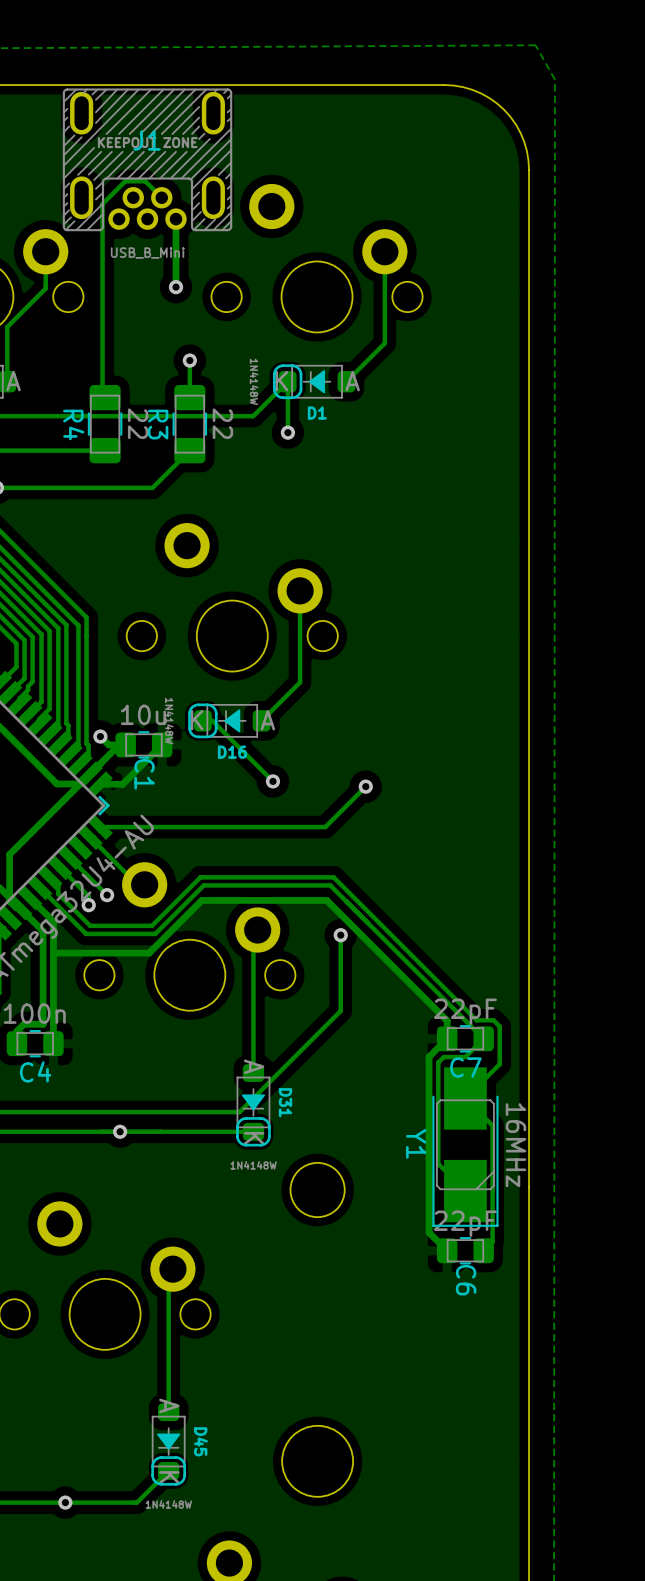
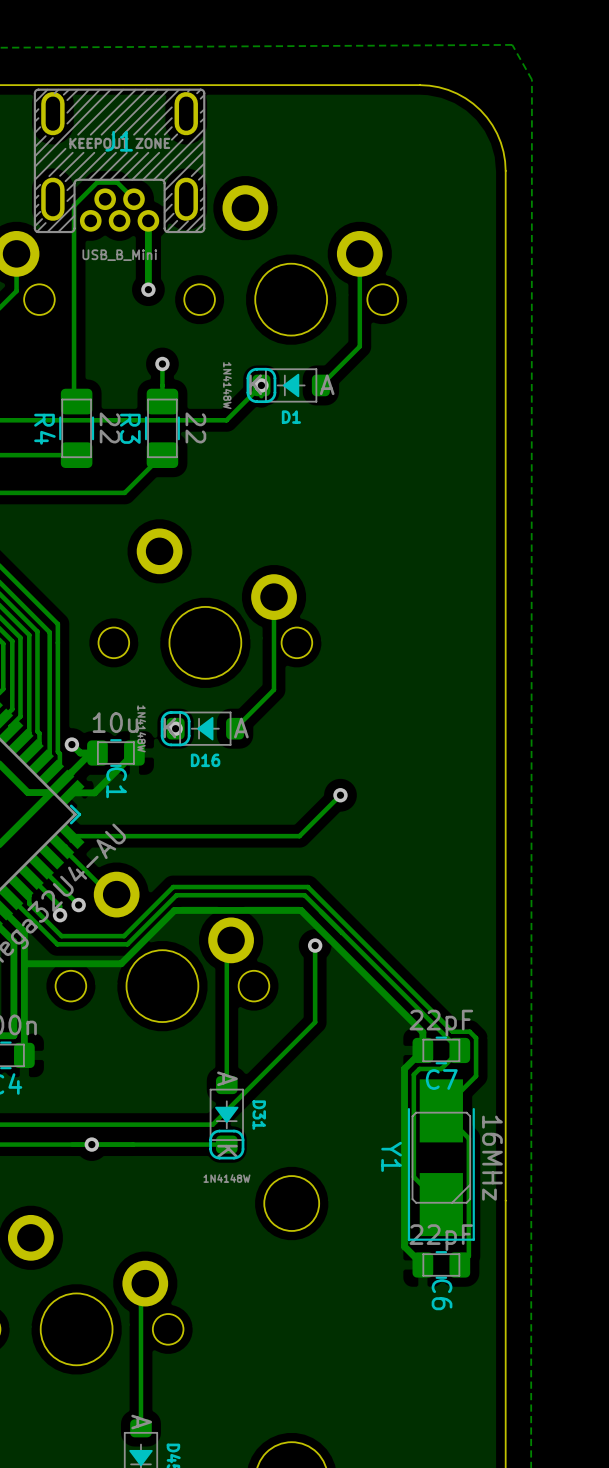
track: (287, 381) (287, 432) -> none
via position: (287, 432) -> (261, 385)
track: (202, 720) (212, 720) (272, 781) -> none
via position: (272, 781) -> (175, 728)

